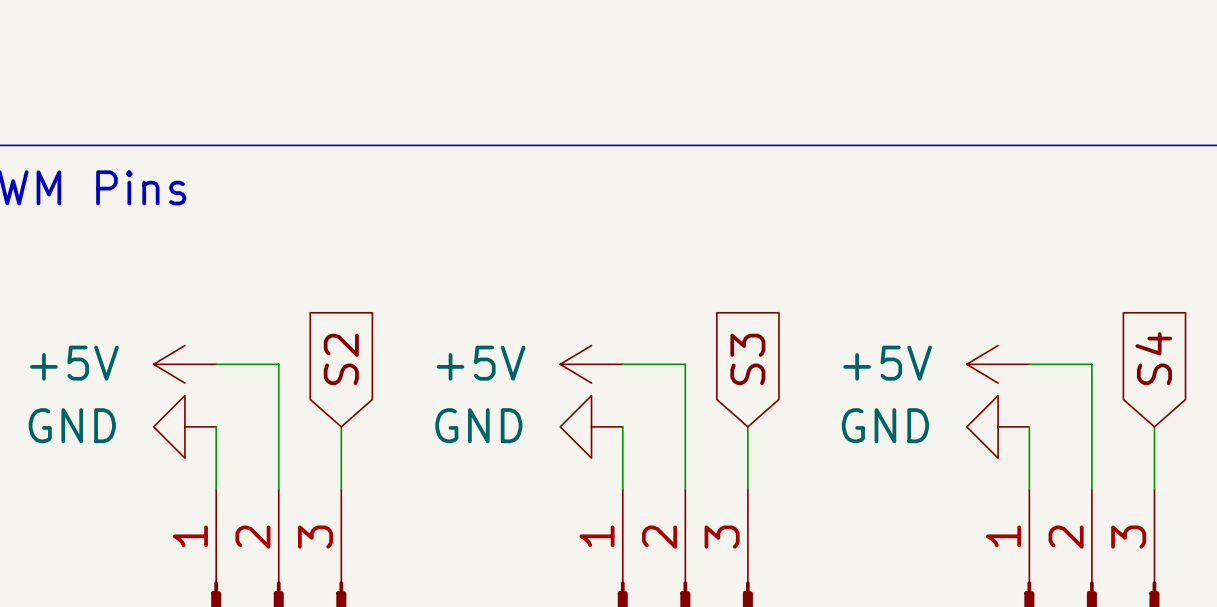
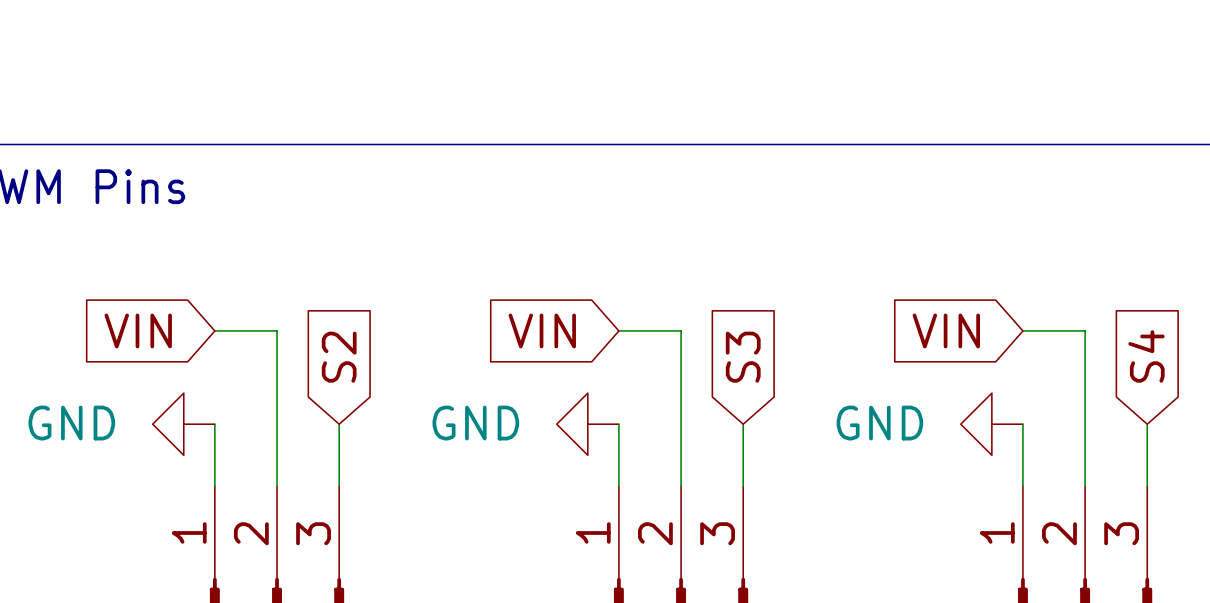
global label: none -> VIN (138, 330)
global label: none -> VIN (542, 330)
global label: none -> VIN (946, 330)
power symbol: +5V (184, 364) -> none
wire: (216, 364) (278, 364) -> (214, 330) (277, 330) (277, 362)
power symbol: +5V (591, 364) -> none
wire: (622, 364) (685, 364) -> (618, 330) (681, 330) (681, 362)
power symbol: +5V (998, 364) -> none
wire: (1029, 364) (1091, 364) -> (1022, 330) (1085, 330) (1085, 362)

